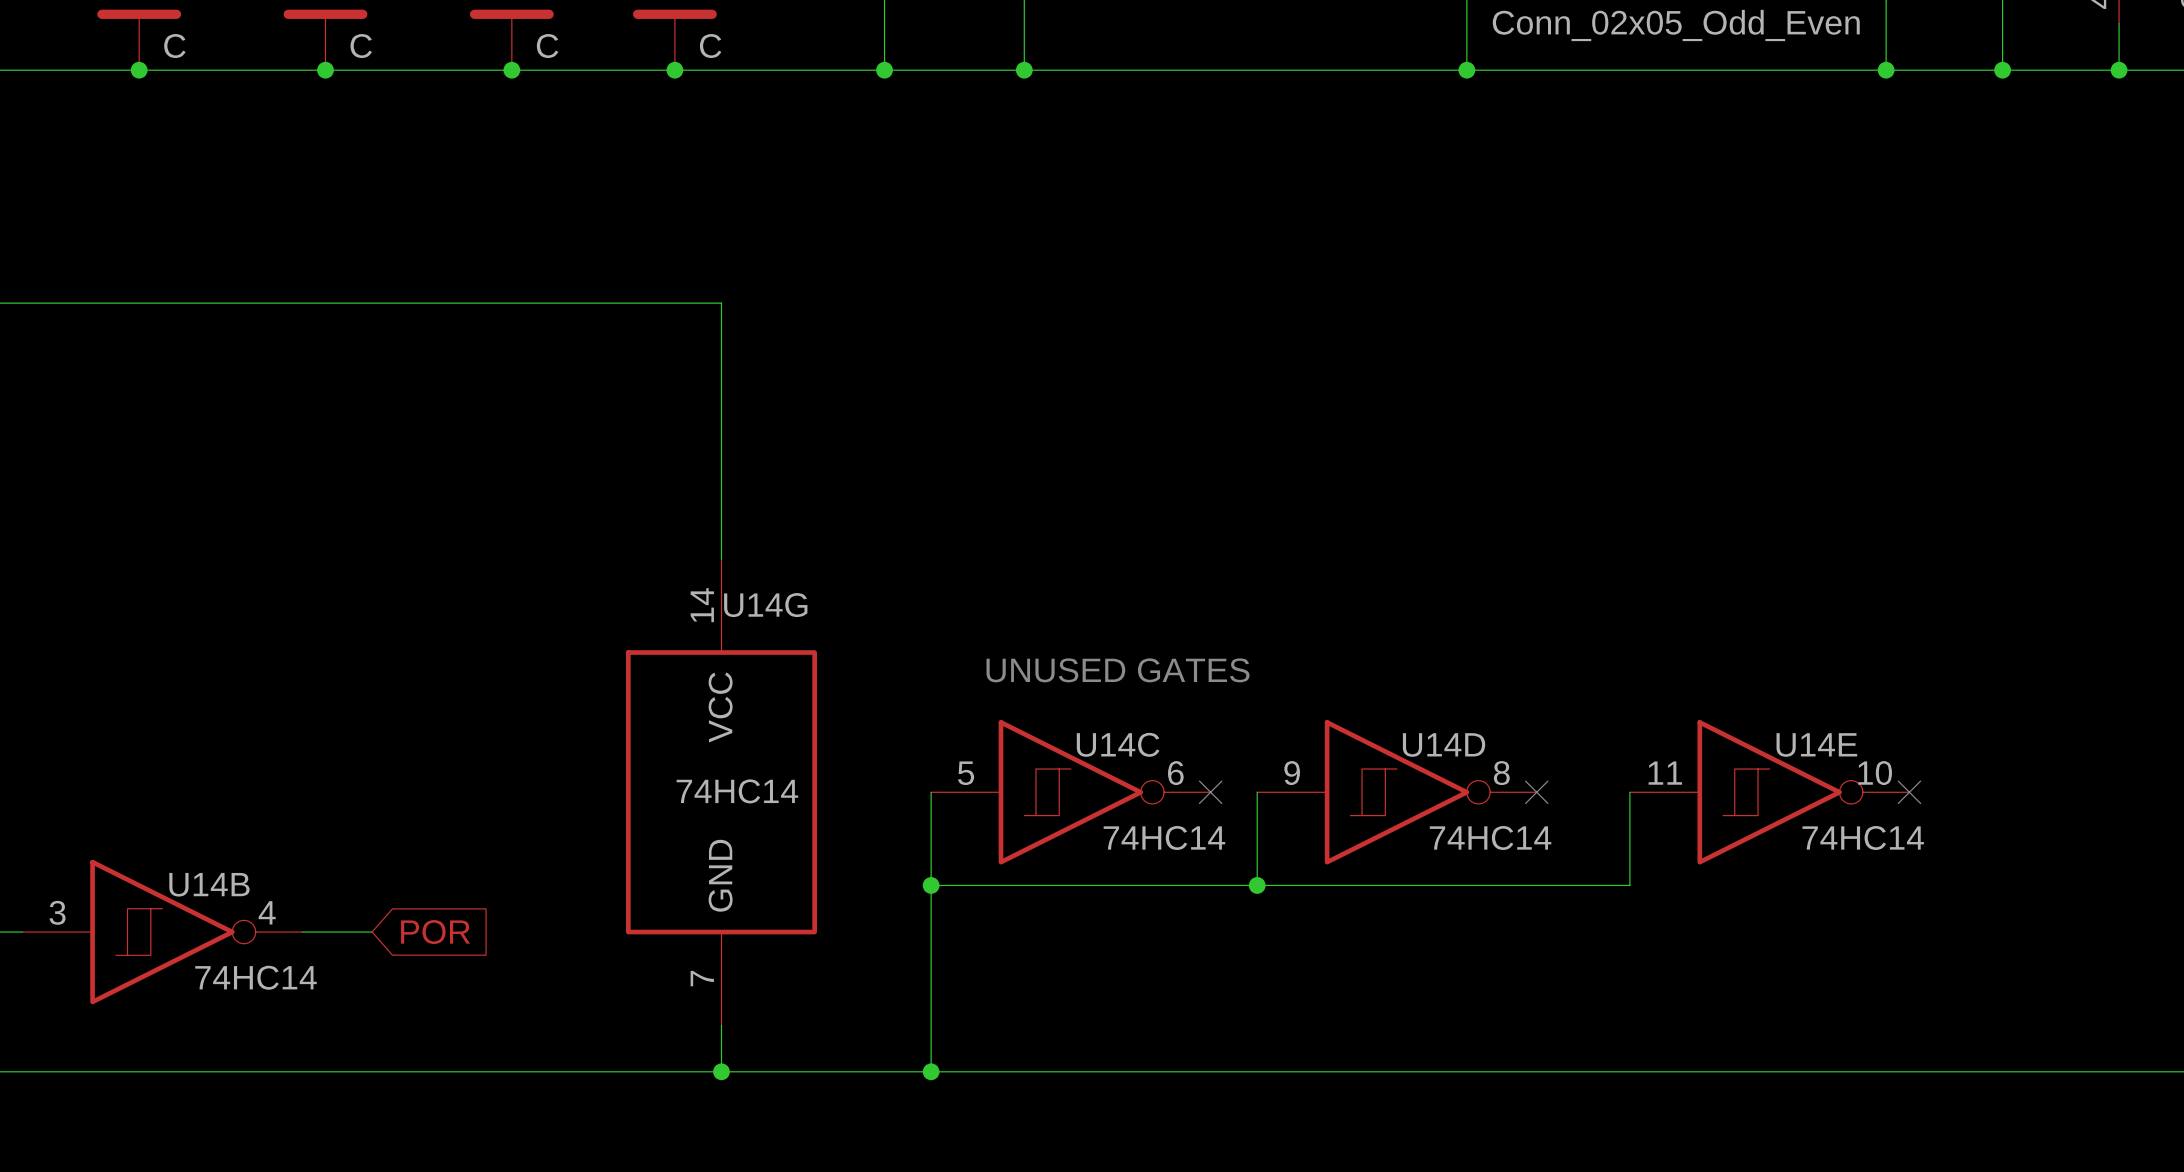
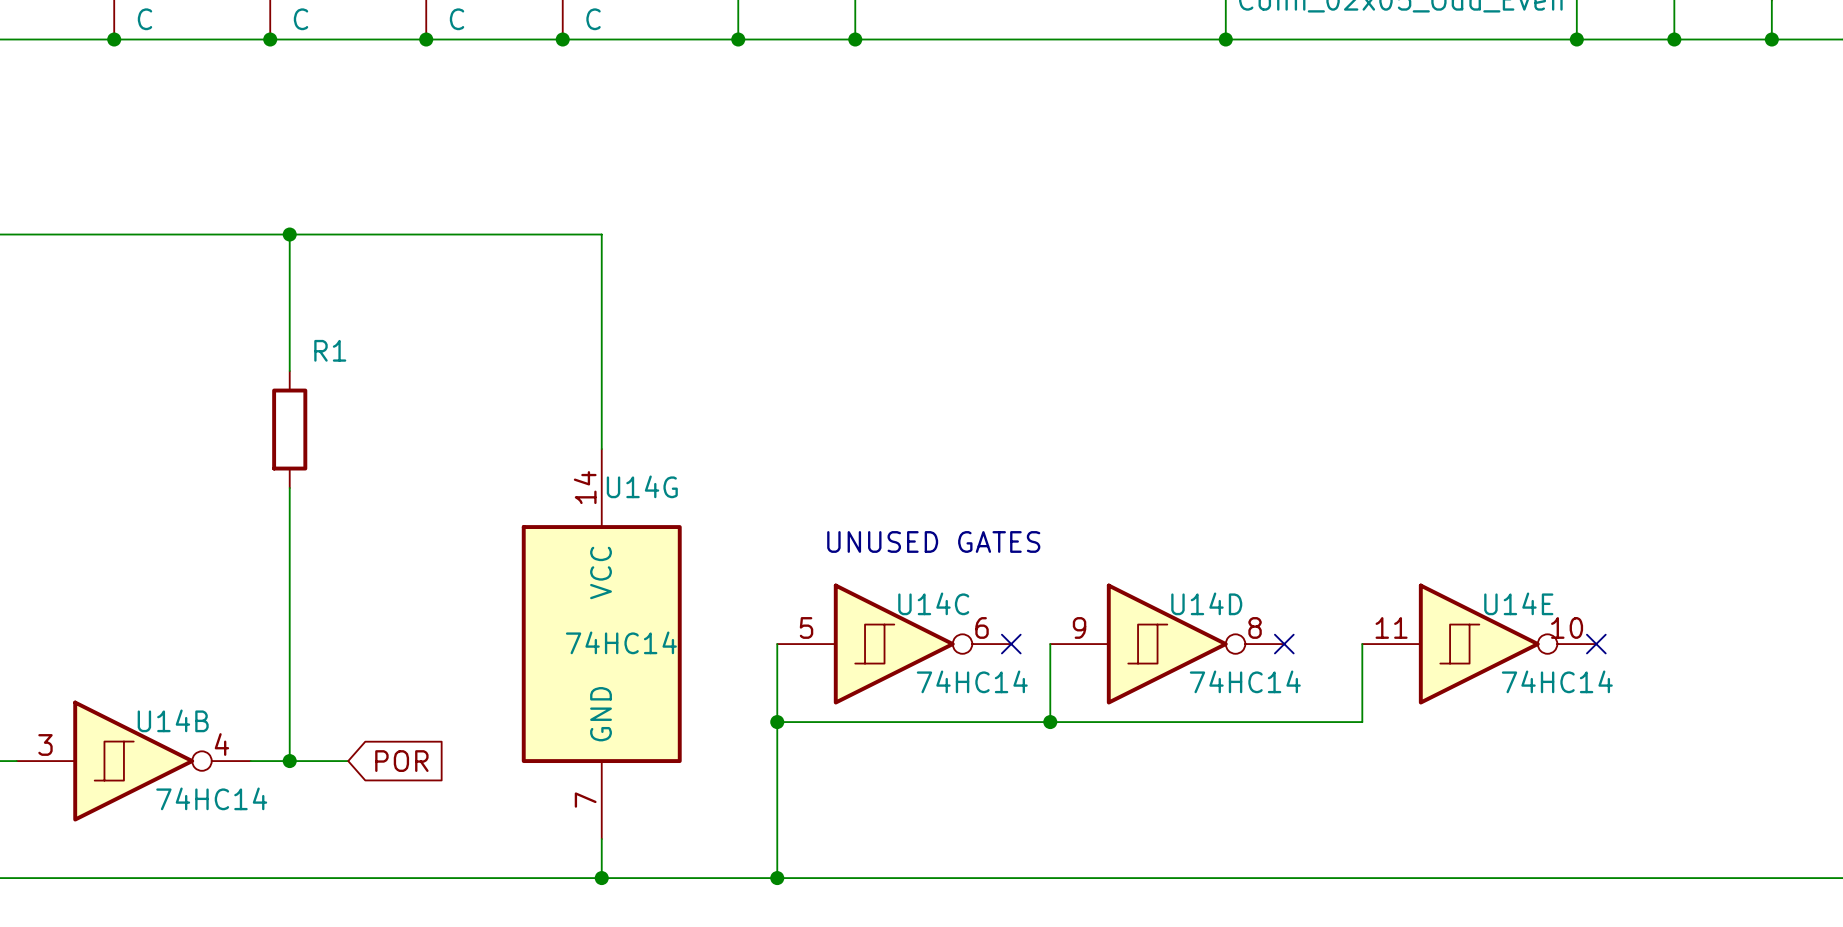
wire: none -> (289, 234) (289, 371)
junction: none -> (289, 234)
R1: none -> (289, 429)
wire: none -> (289, 488) (289, 761)
junction: none -> (289, 761)
wire: none -> (309, 761) (348, 761)
global label position: POR (435, 932) -> POR (401, 761)

